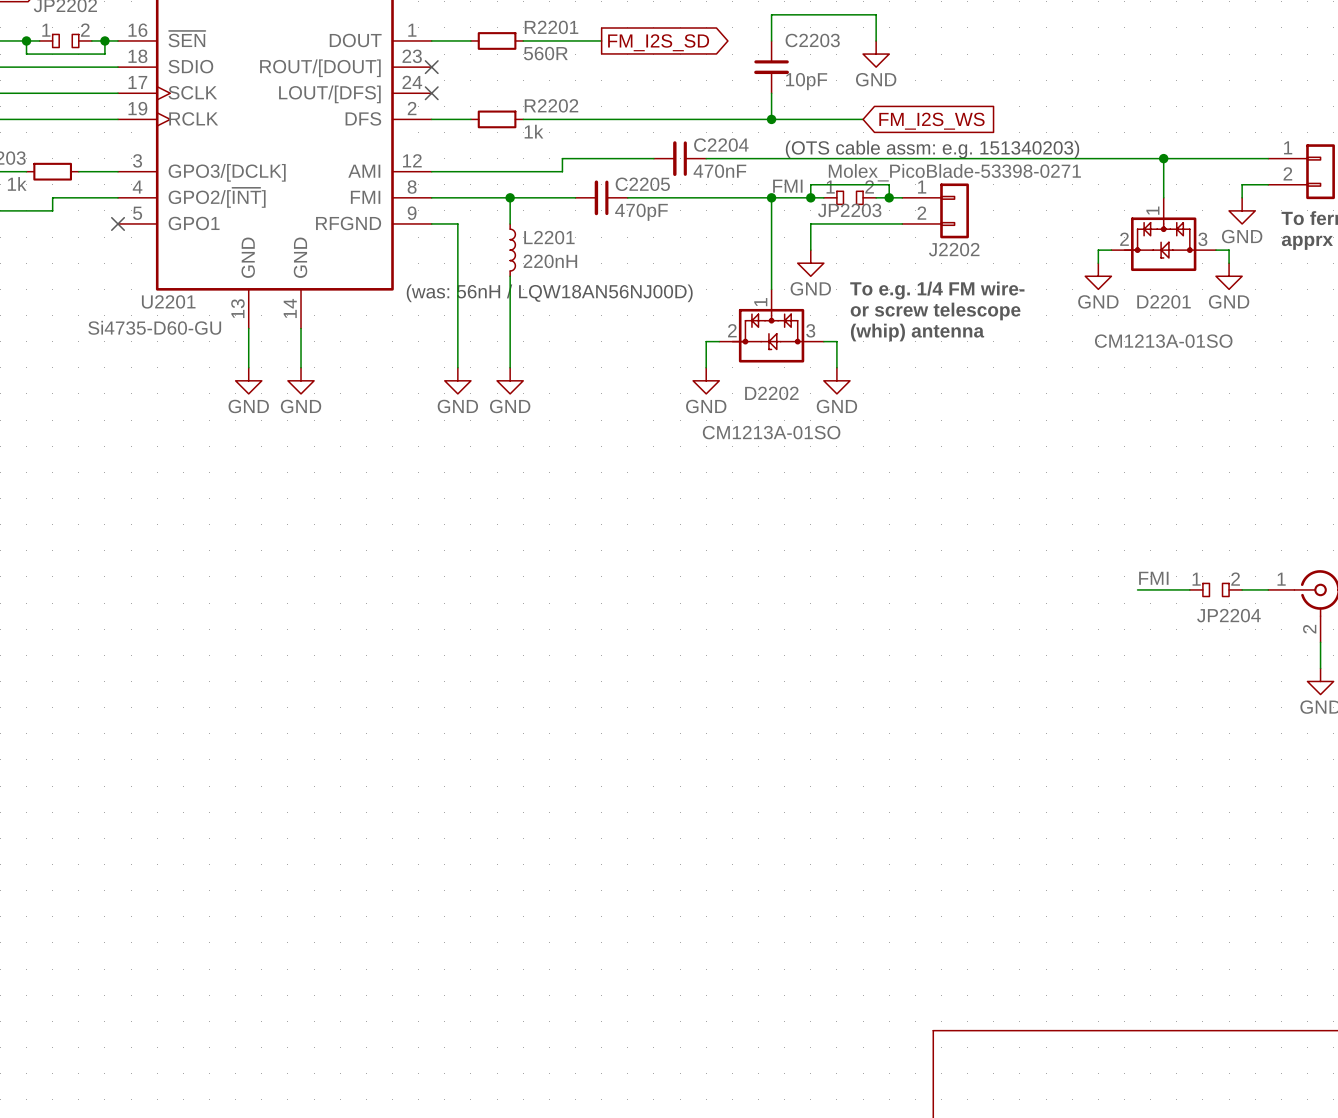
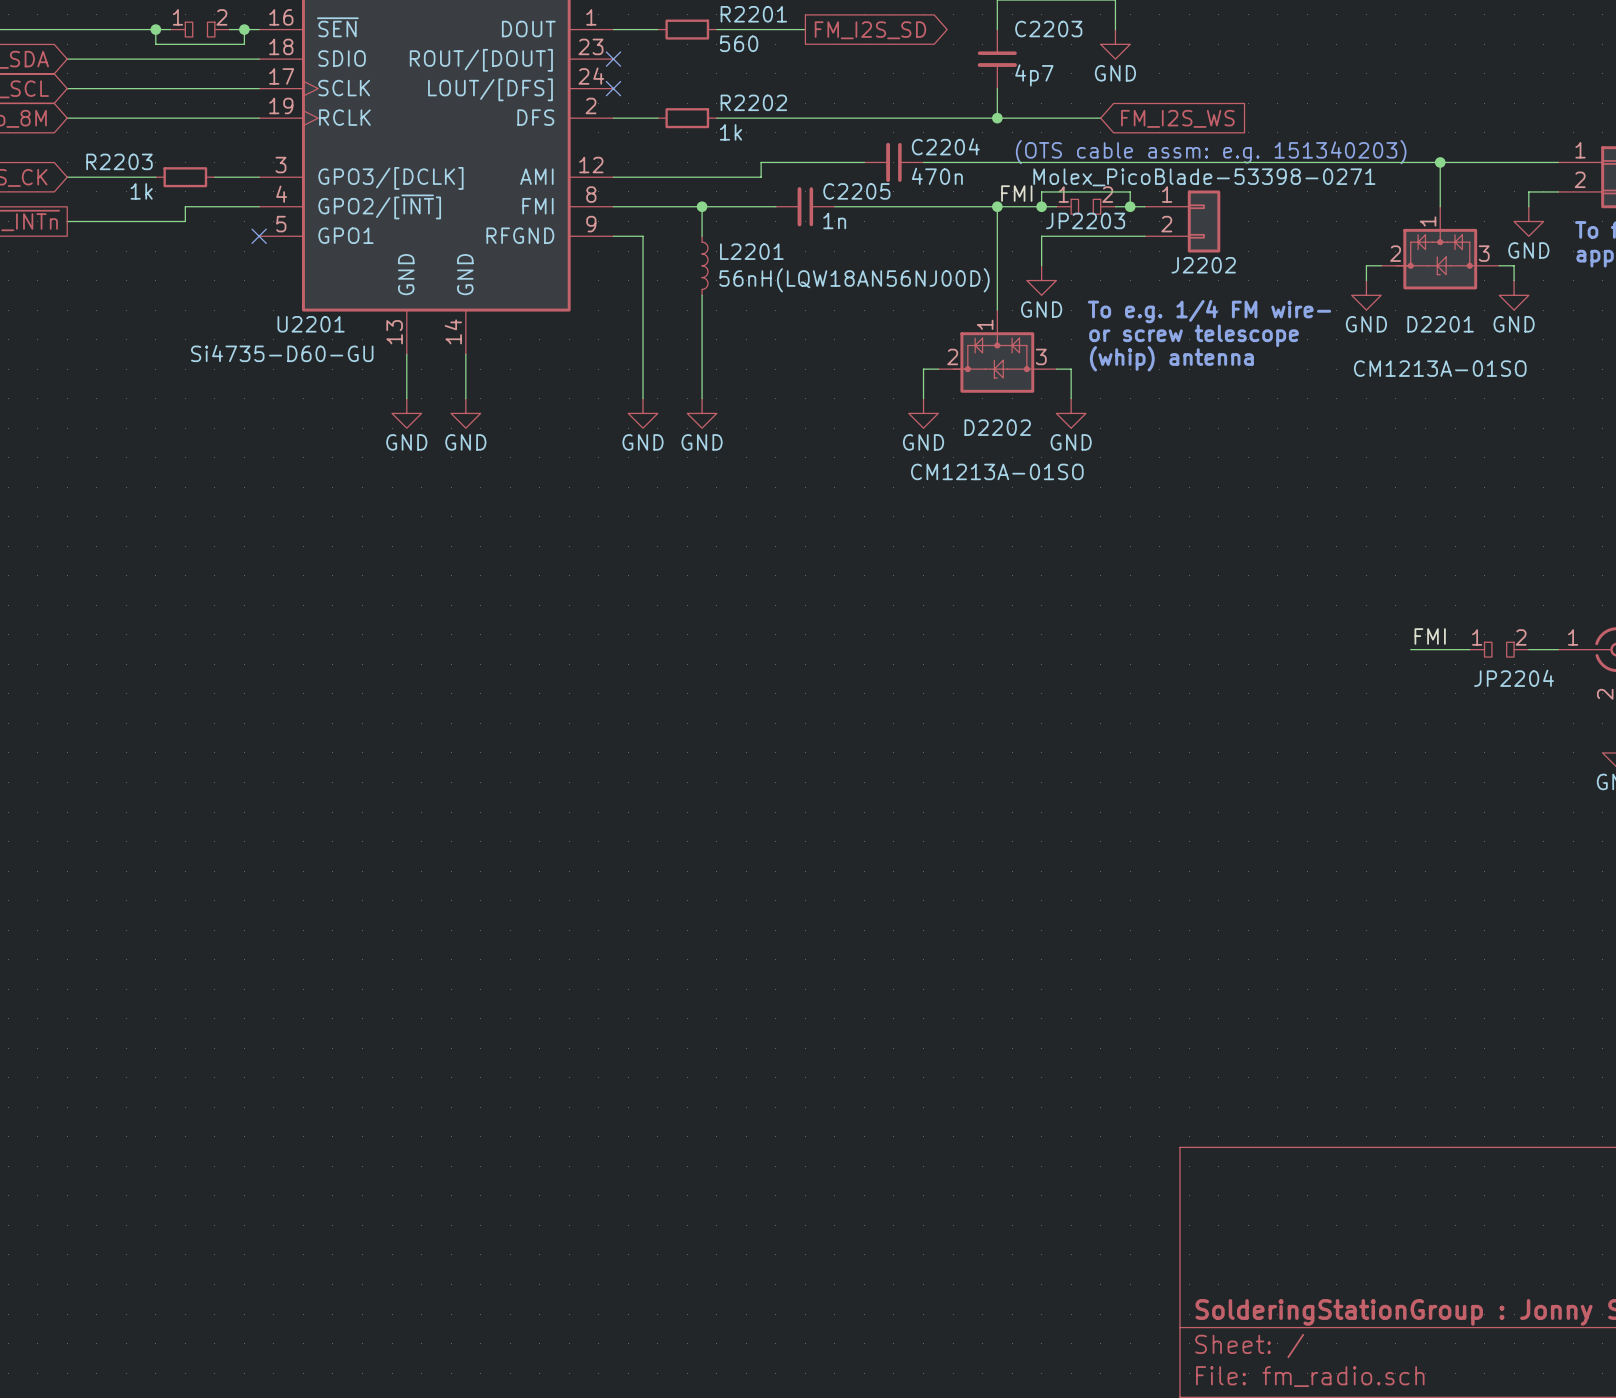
R2201 value: 560R (545, 53) -> 560 (739, 43)
C2203 value: 10pF (806, 81) -> 4p7 (1034, 75)
C2204 value: 470nF (719, 171) -> 470n (937, 176)
C2205 value: 470pF (641, 212) -> 1n (834, 220)
L2201 value: 220nH (550, 261) -> 56nH(LQW18AN56NJ00D) (854, 280)
text: (was: 56nH / LQW18AN56NJ00D) (549, 293) -> none

